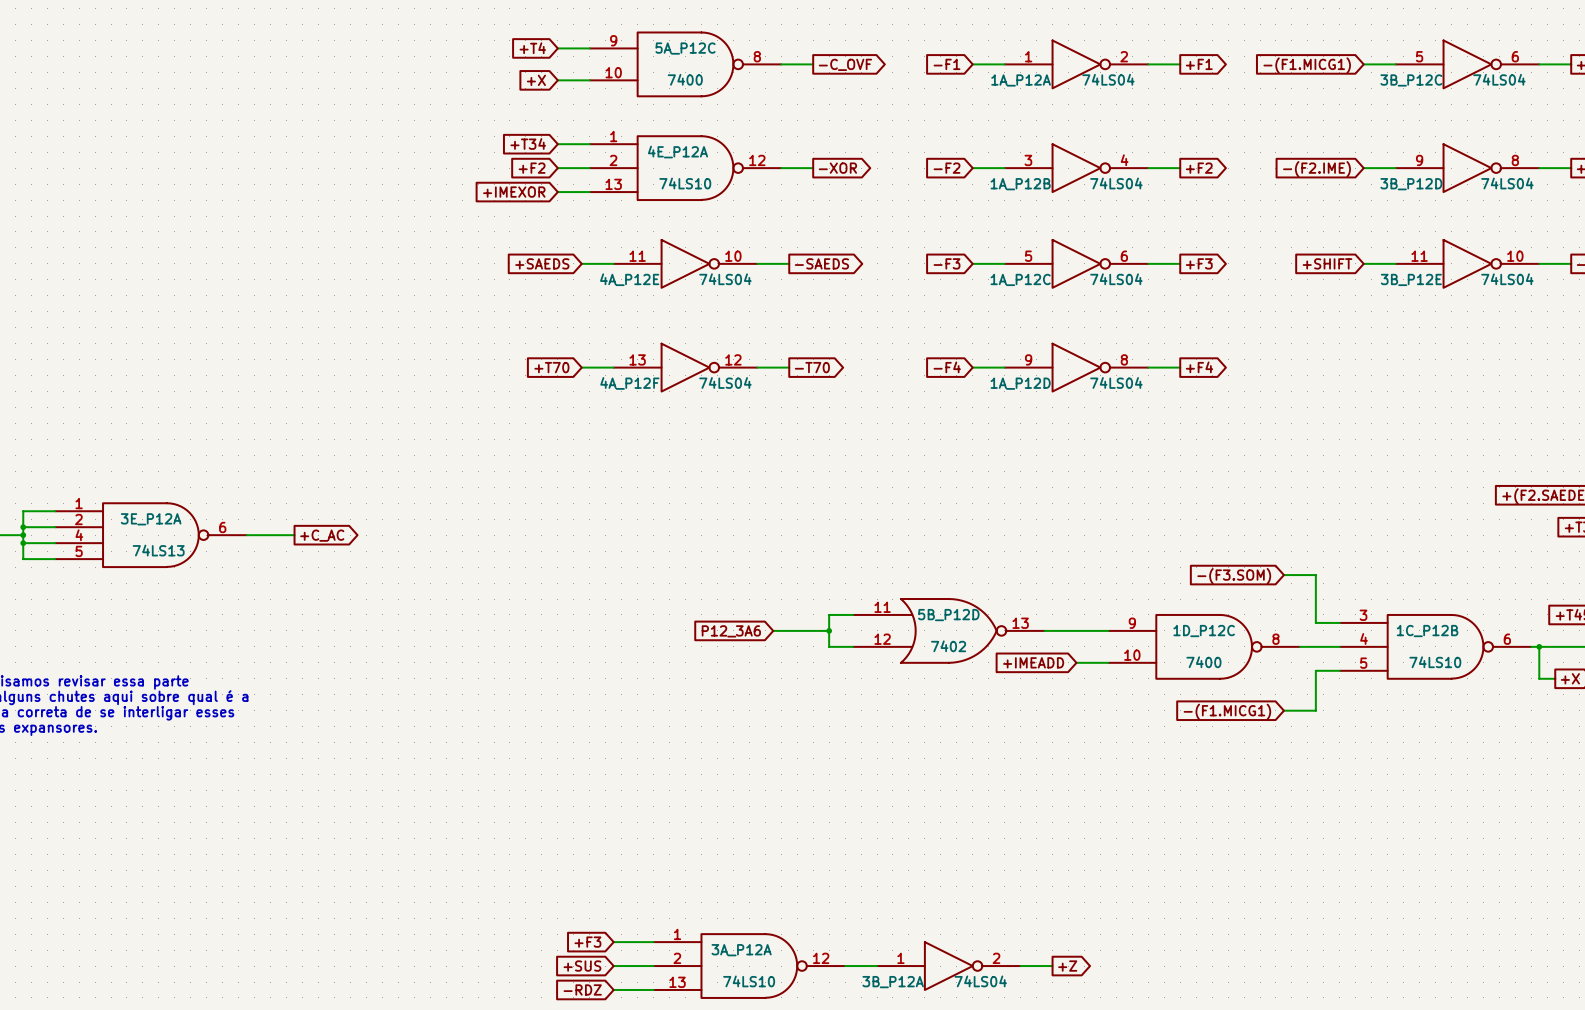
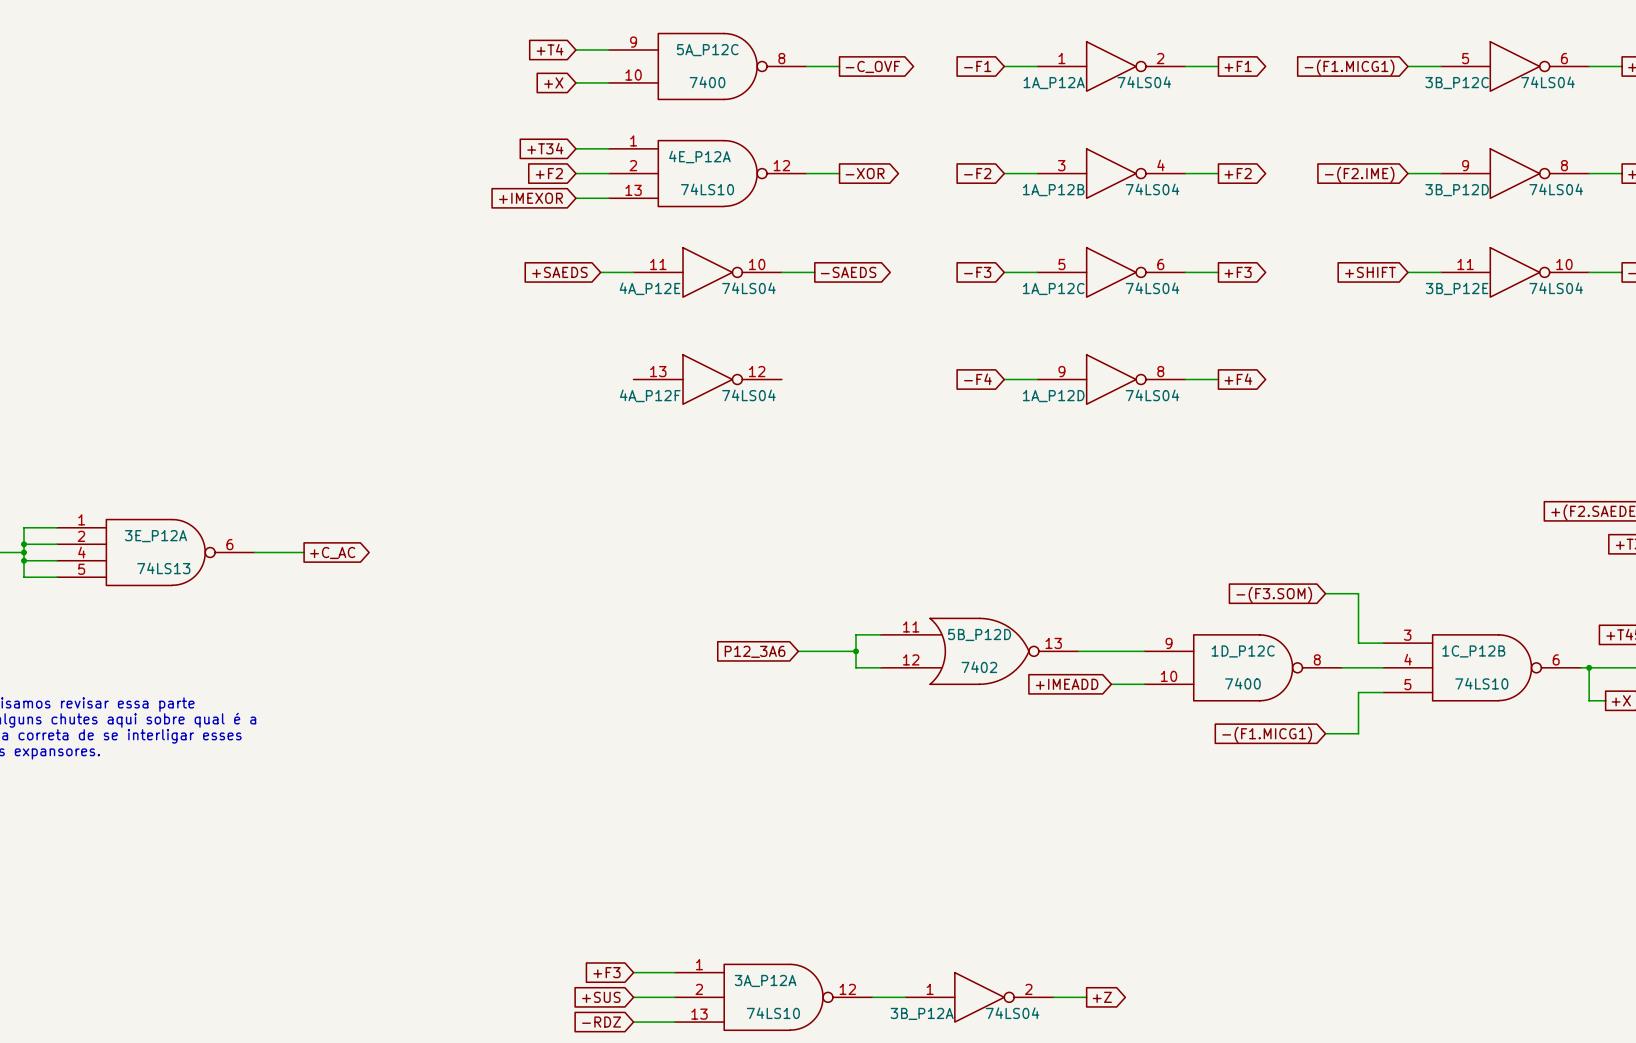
global label: +T70 (551, 367) -> none
wire: (581, 367) (613, 367) -> none
wire: (757, 367) (789, 367) -> none
global label: -T70 (812, 367) -> none

